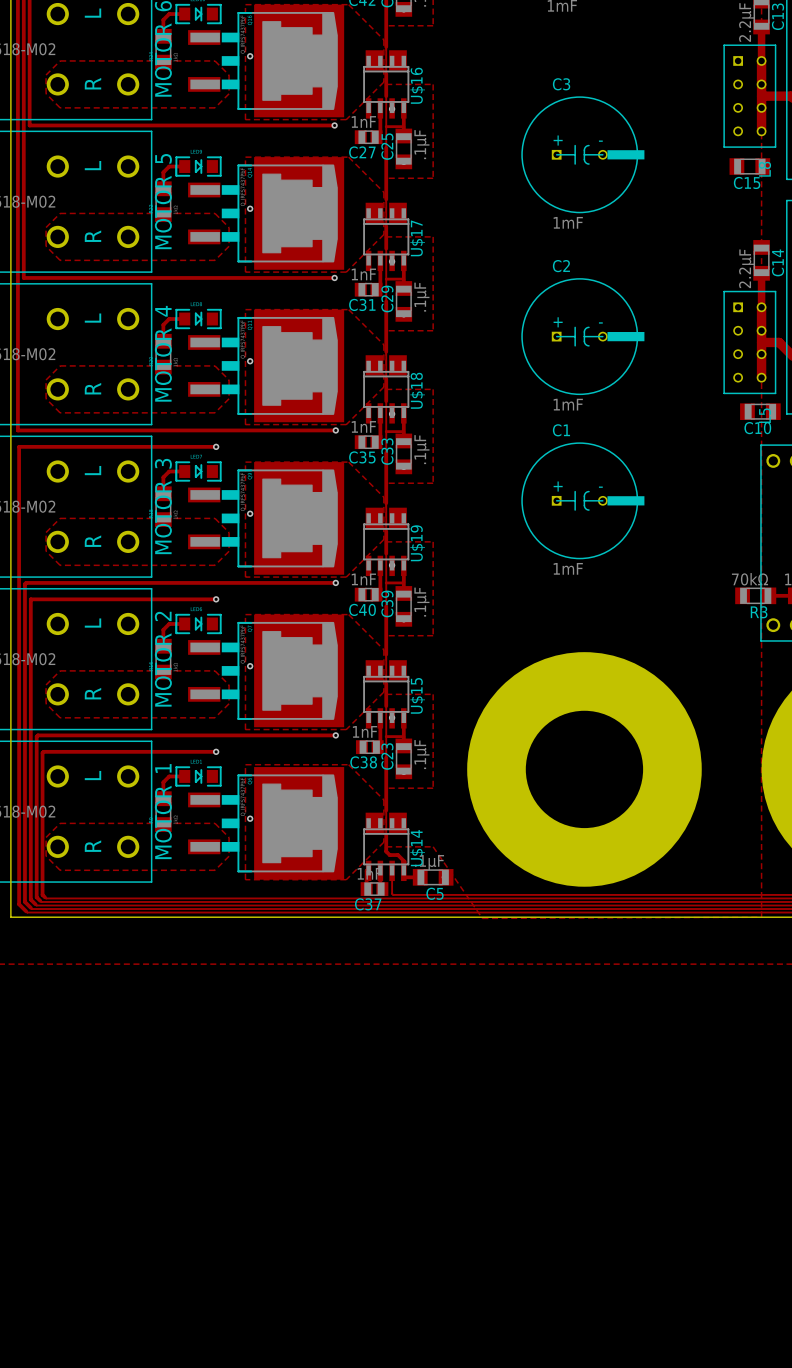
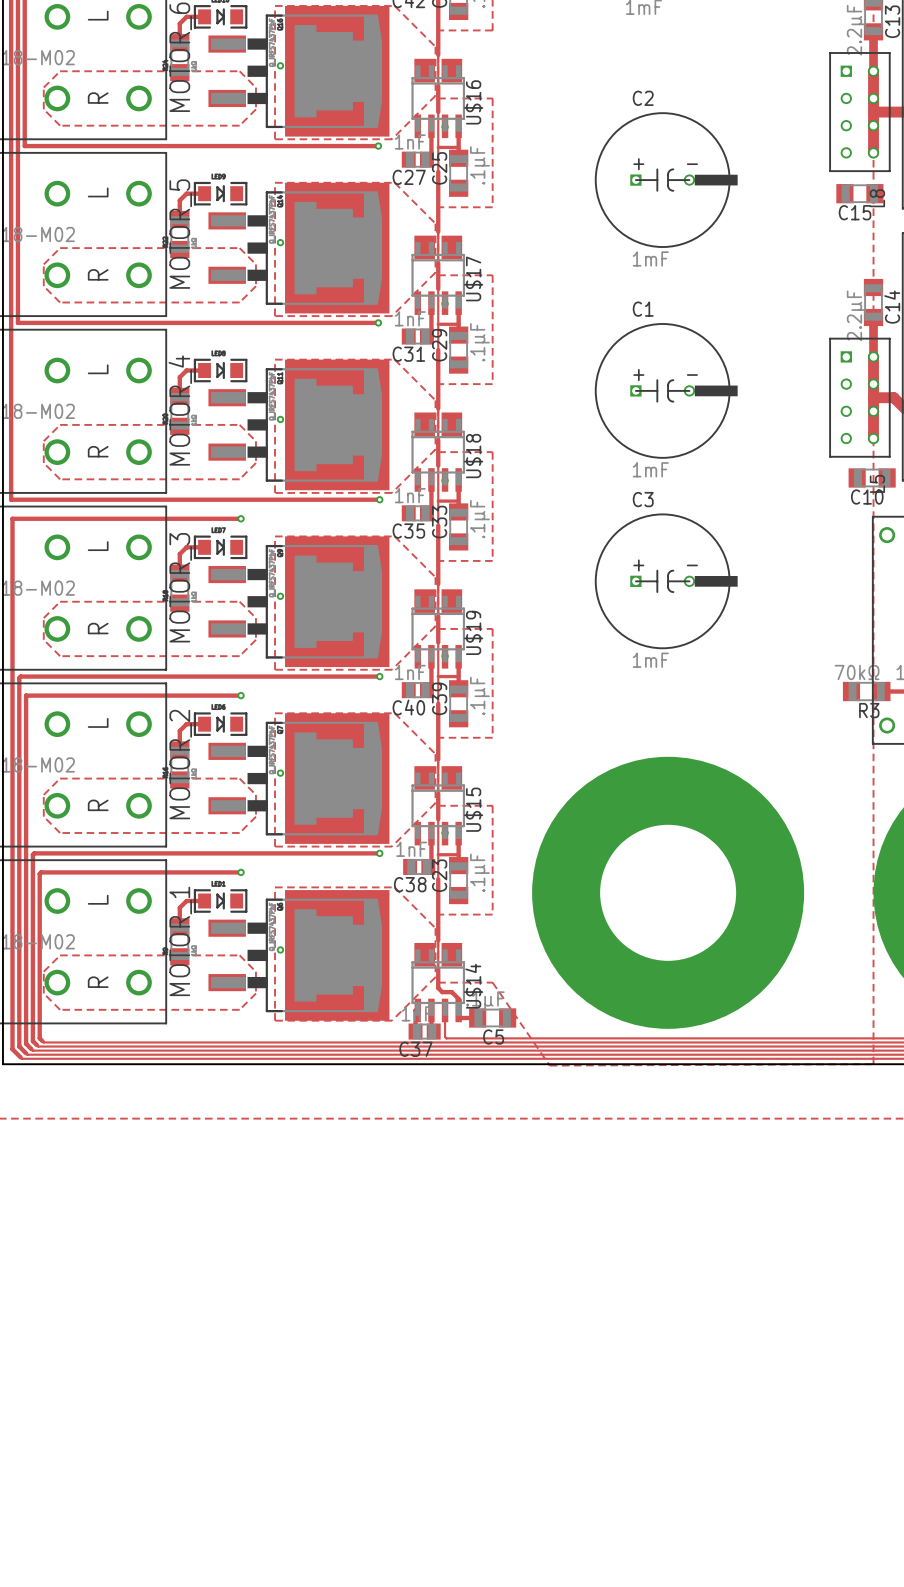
C3 name: C3 (561, 84) -> C2 (643, 98)
C2 name: C2 (561, 266) -> C1 (643, 309)
C1 name: C1 (561, 430) -> C3 (643, 499)

